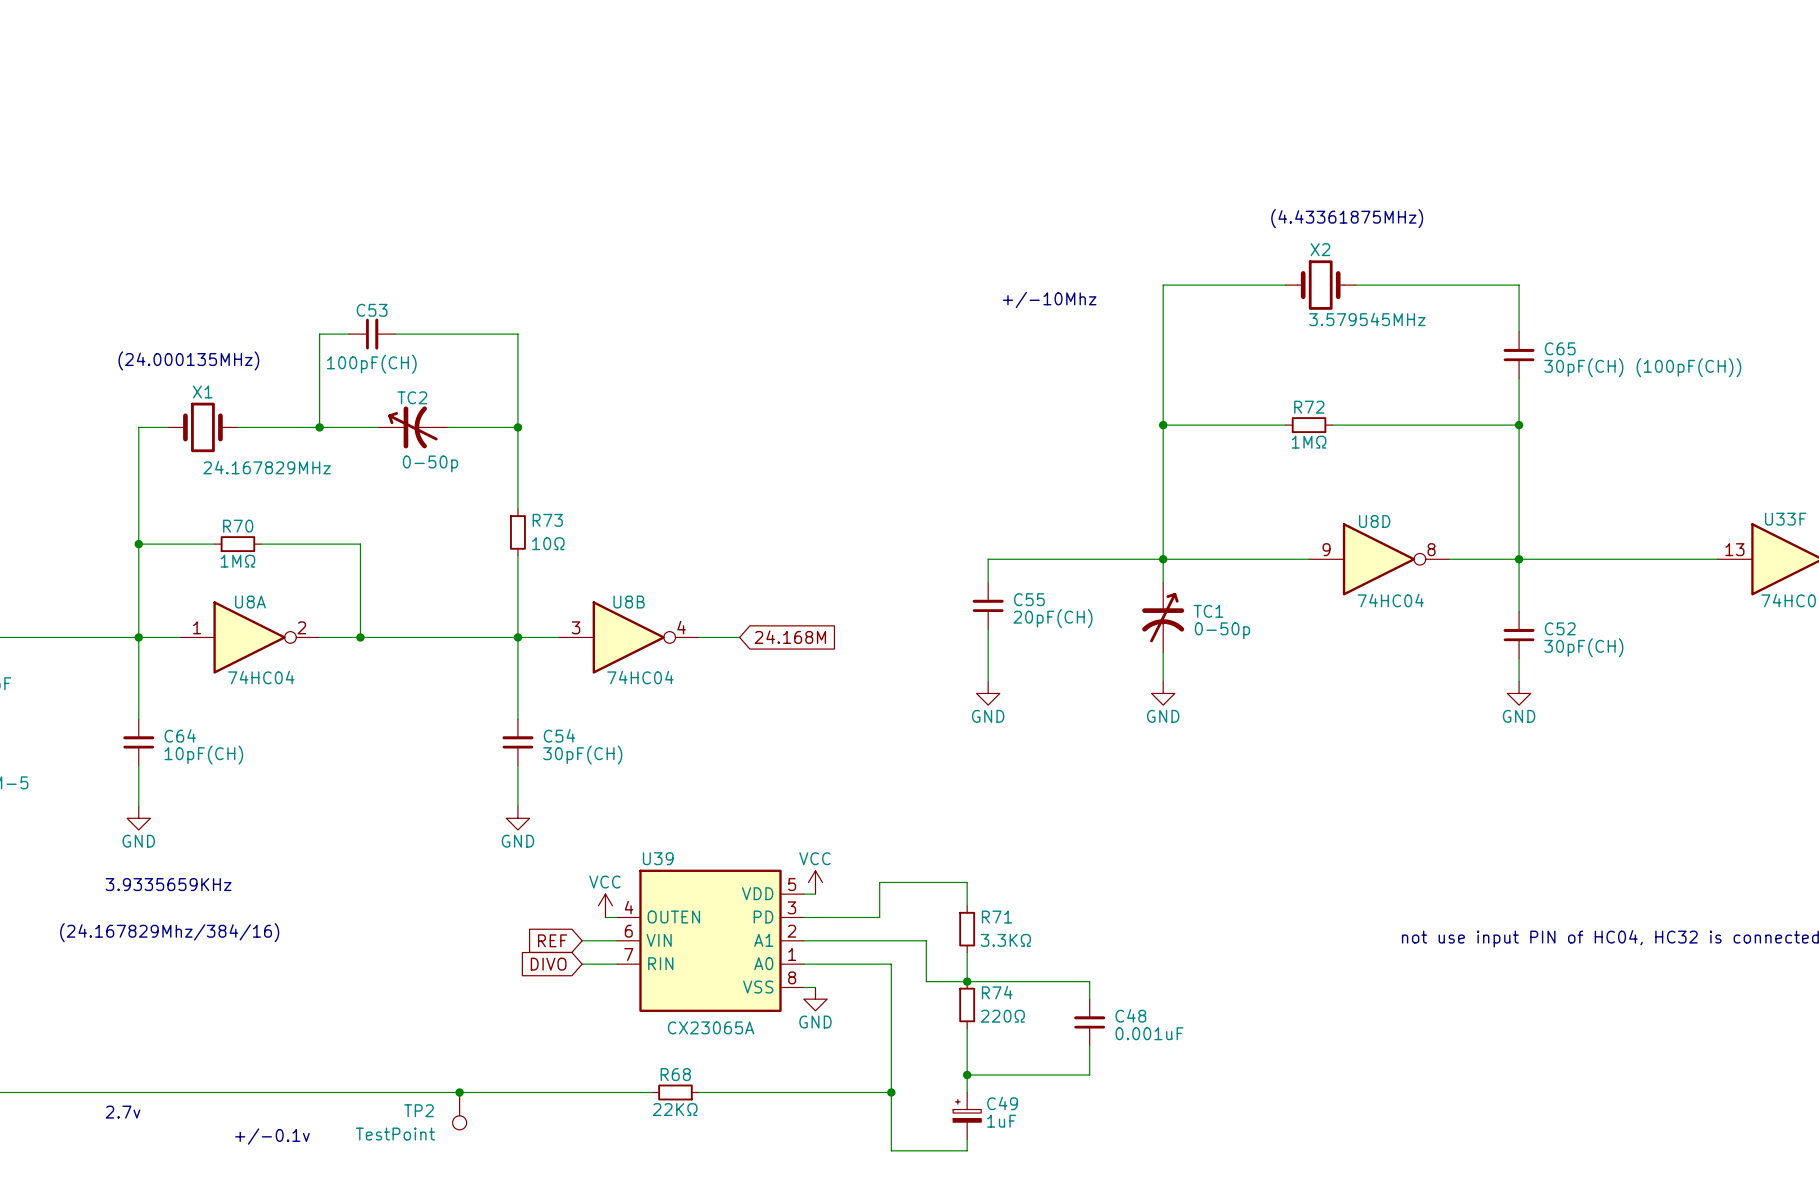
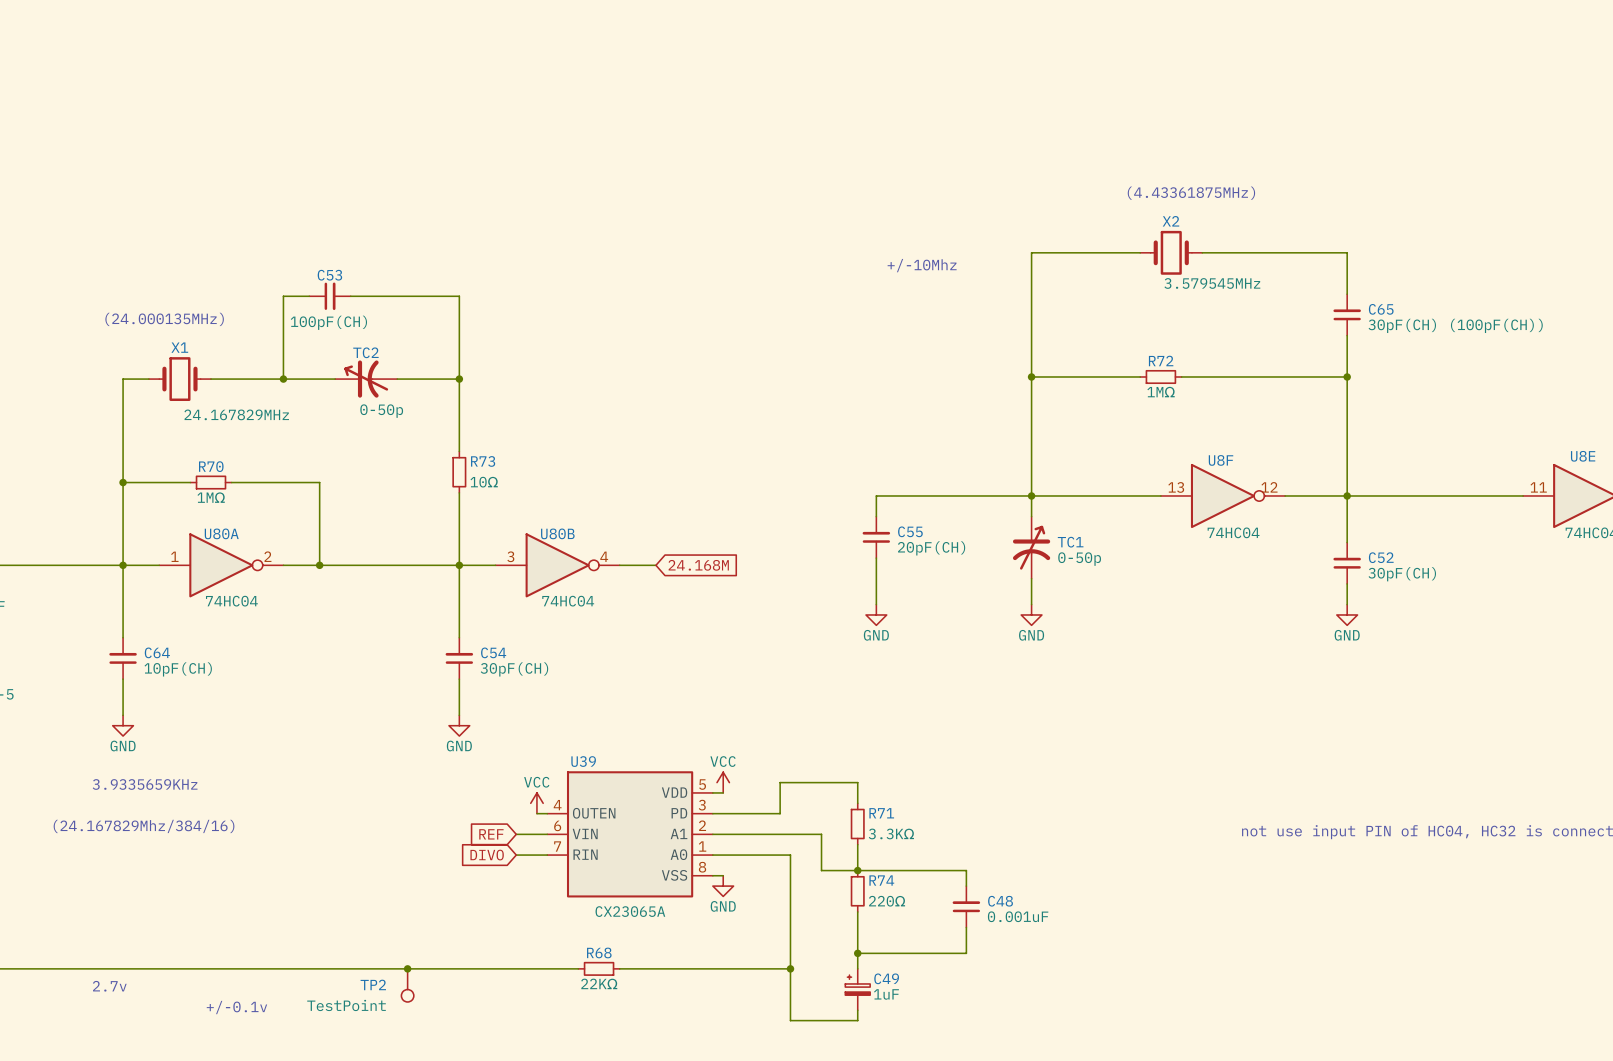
U33F name: U33F (1785, 519) -> U8E (1583, 456)
U8D name: U8D (1374, 521) -> U8F (1221, 460)
U8D pin number: 9 (1326, 549) -> 13 (1176, 487)
U8D pin number: 8 (1431, 549) -> 12 (1269, 487)
U33F pin number: 13 (1734, 549) -> 11 (1538, 487)
U8A name: U8A (250, 602) -> U80A (221, 533)
U8B name: U8B (629, 602) -> U80B (557, 533)

